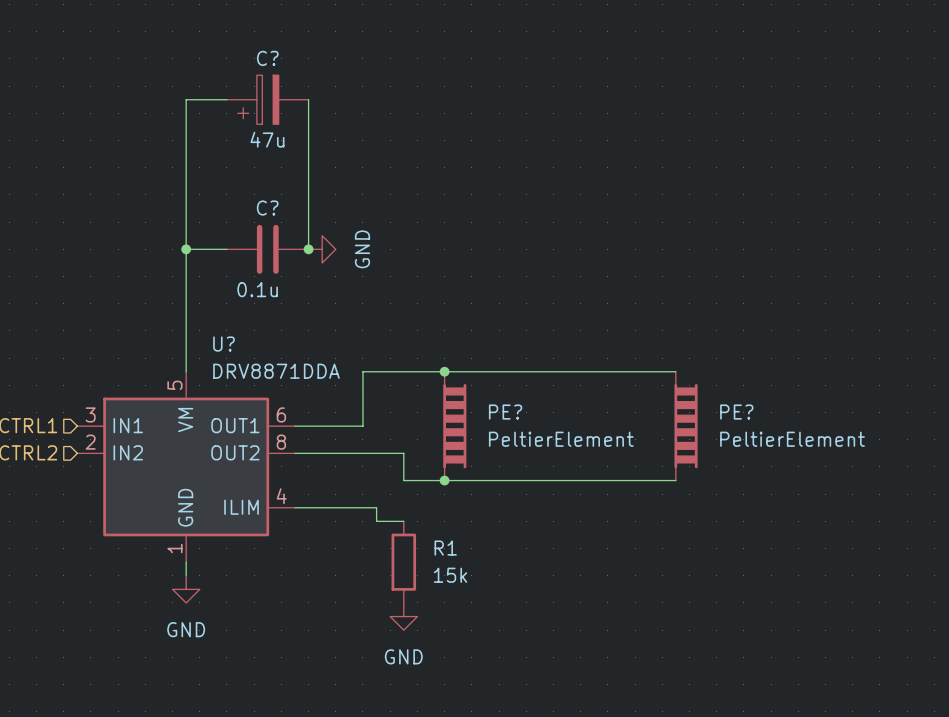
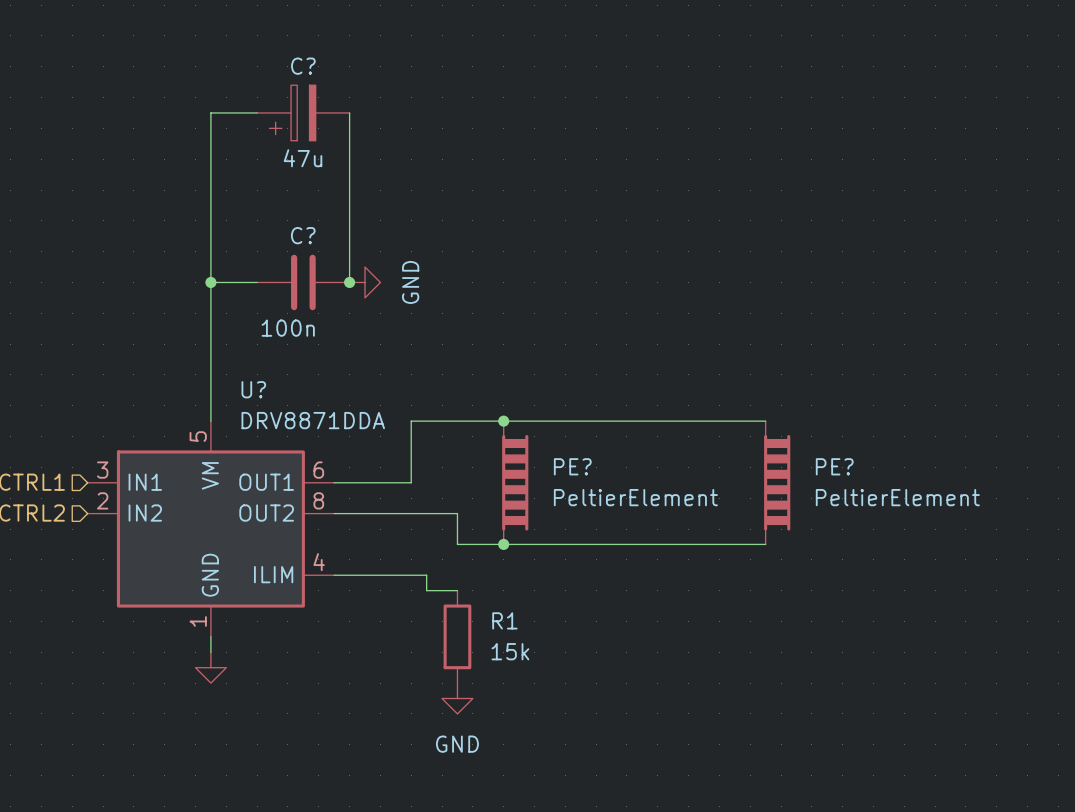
C? value: 0.1u (257, 289) -> 100n (288, 328)
power symbol text: GND (186, 629) -> none

